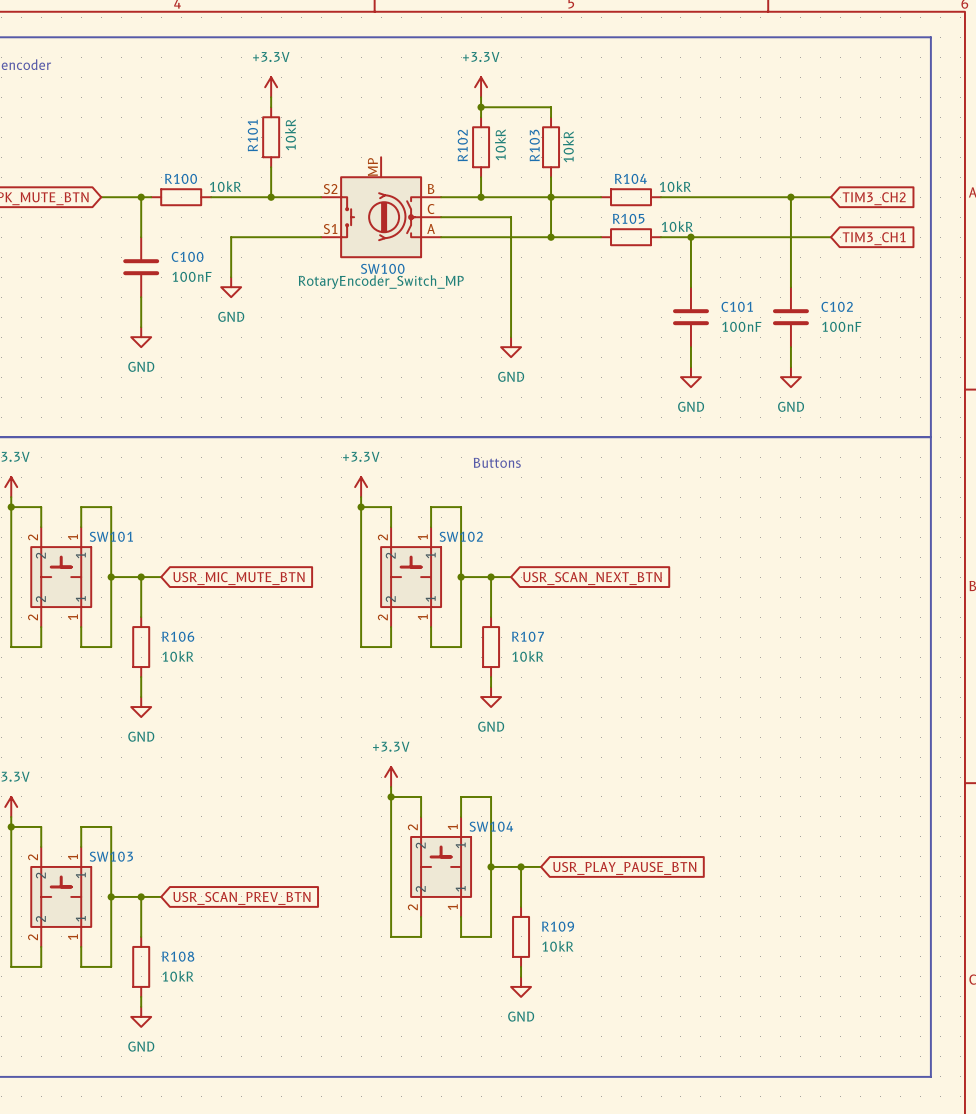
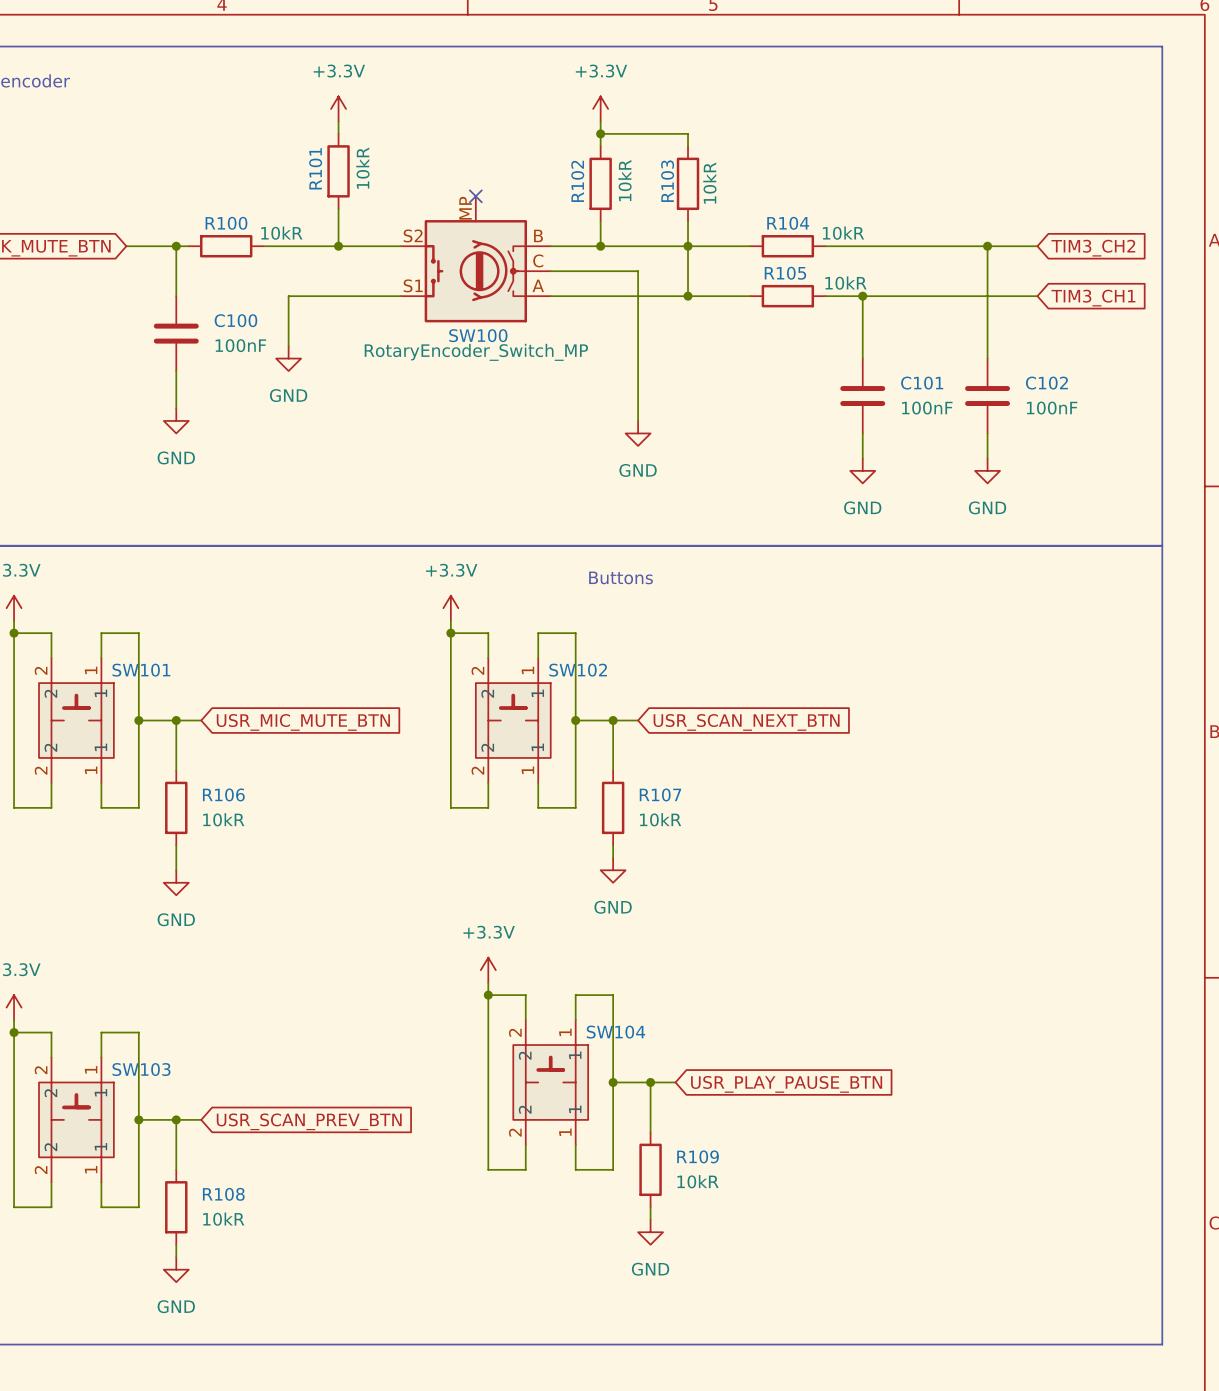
no-connect mark: none -> (475, 196)

